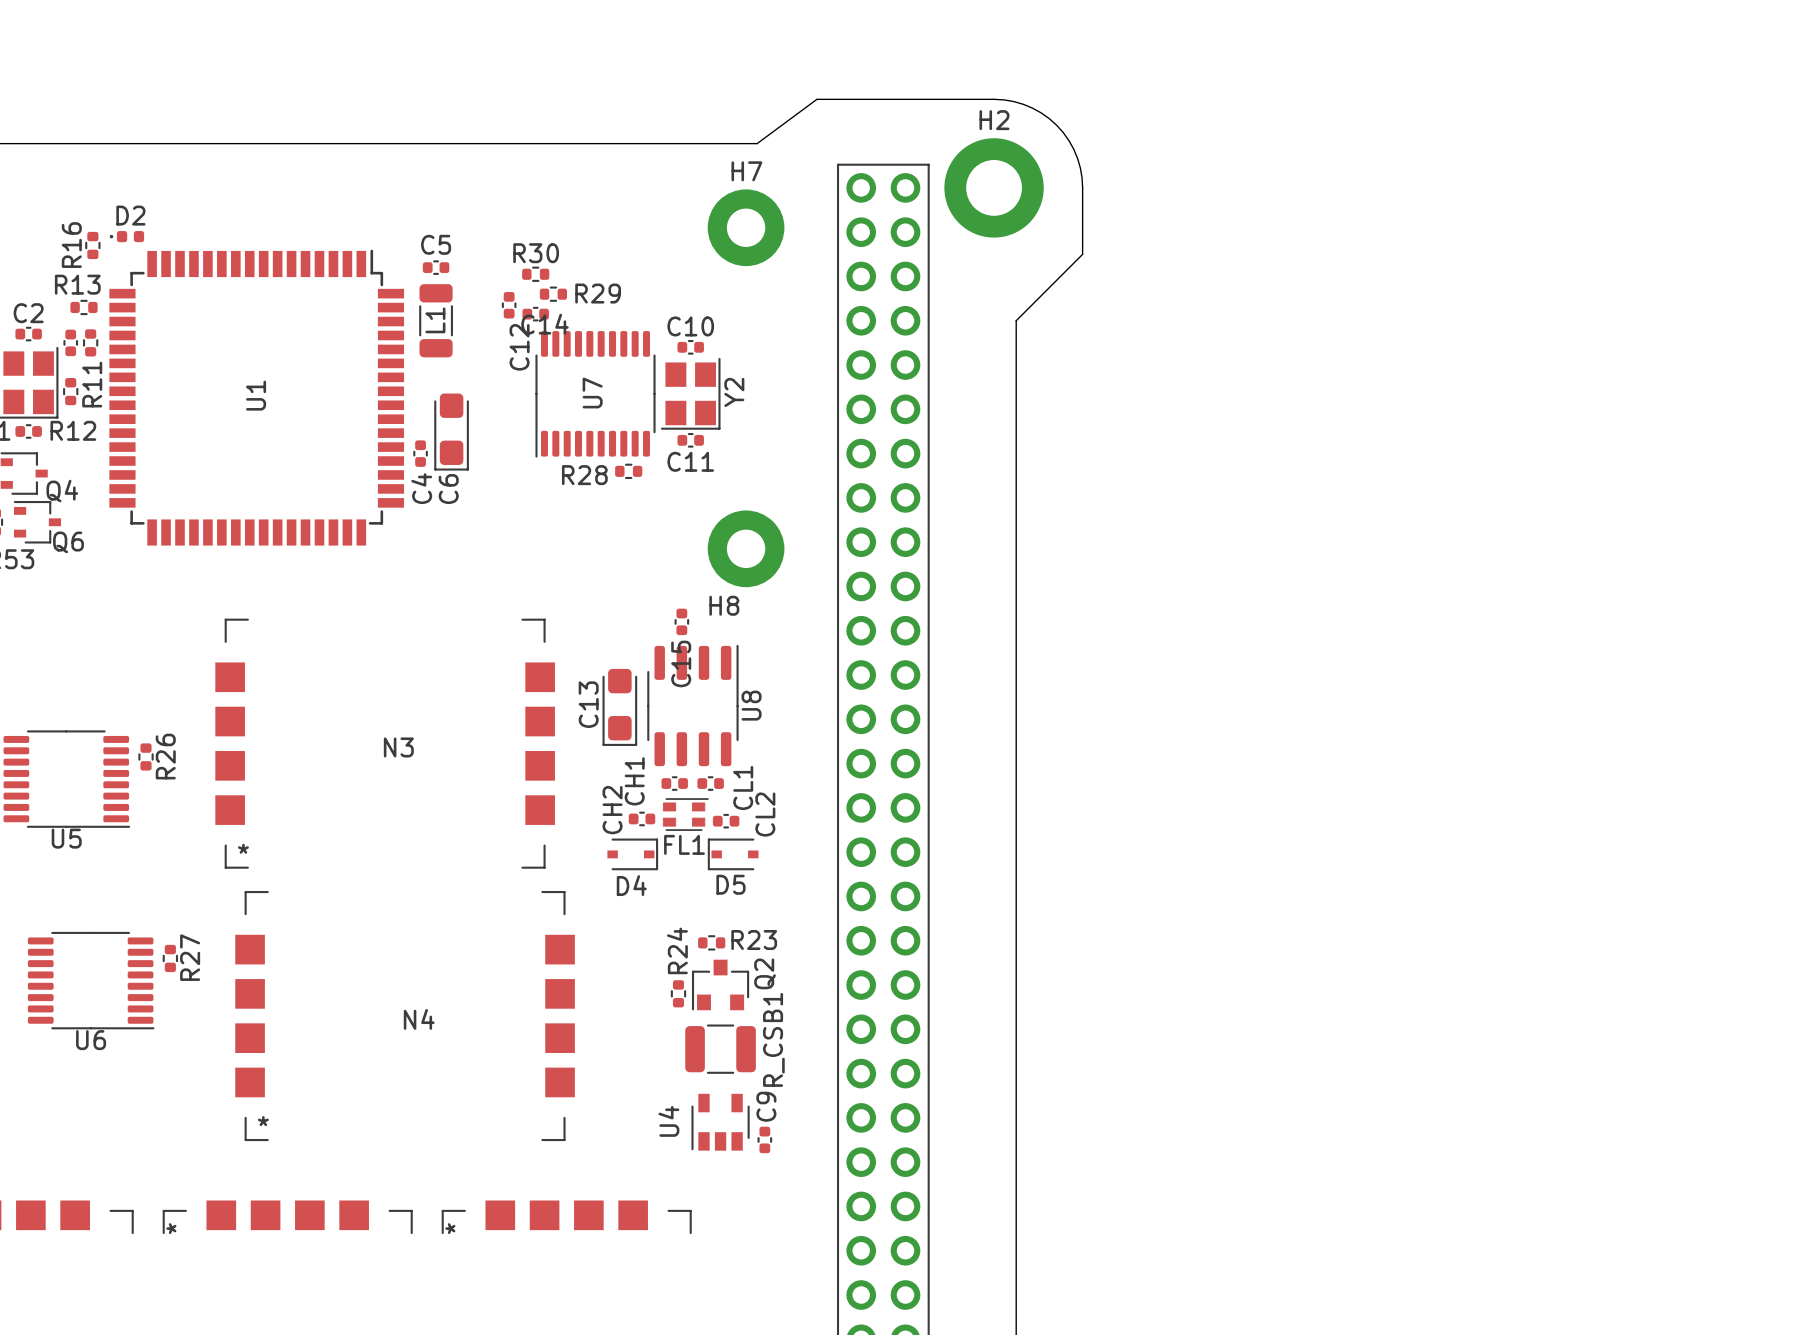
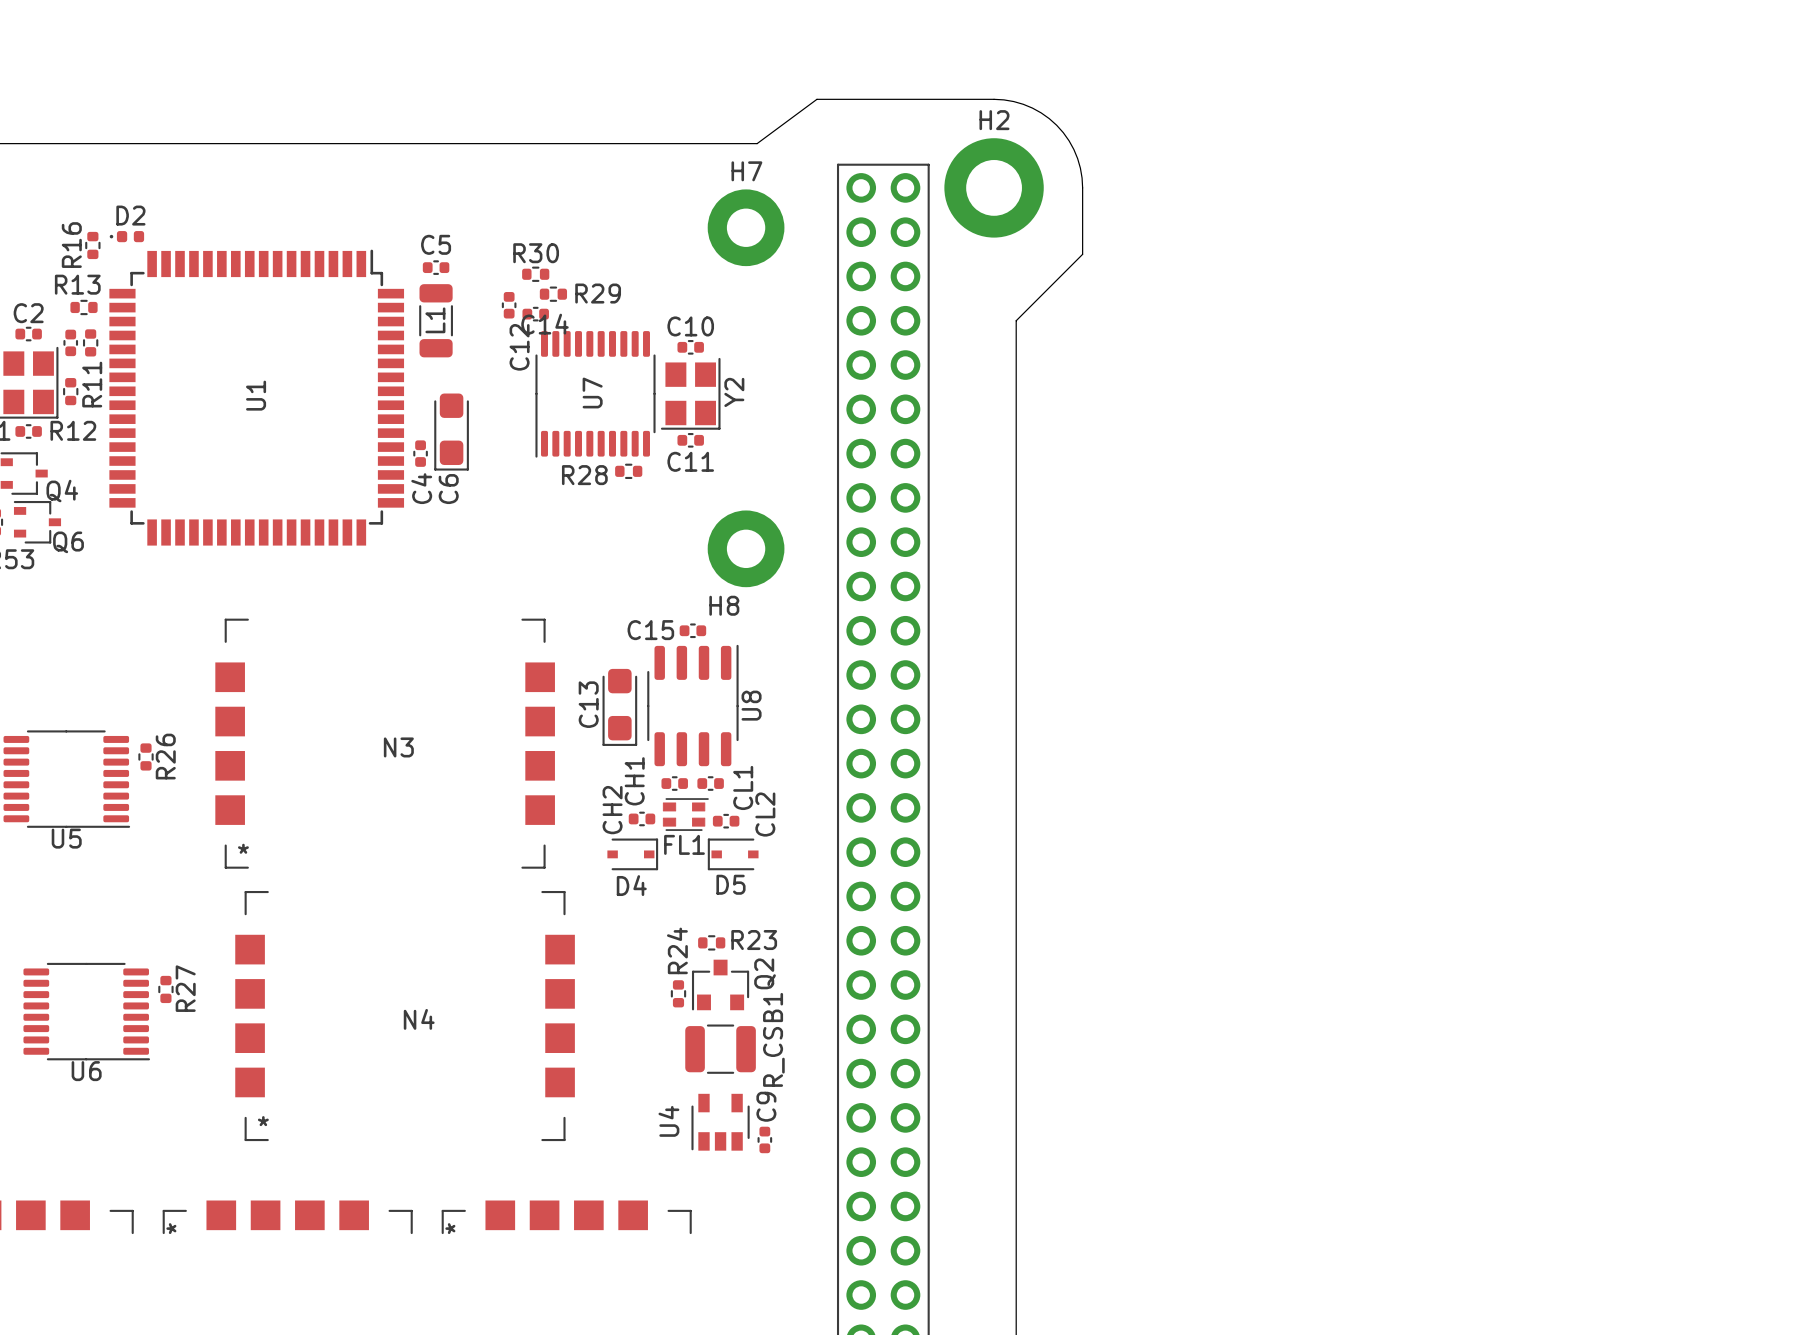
C15 rotation: 0° (681, 621) -> 90° clockwise (692, 630)
R27 position: (170, 958) -> (165, 989)
U6 position: (91, 980) -> (86, 1011)

